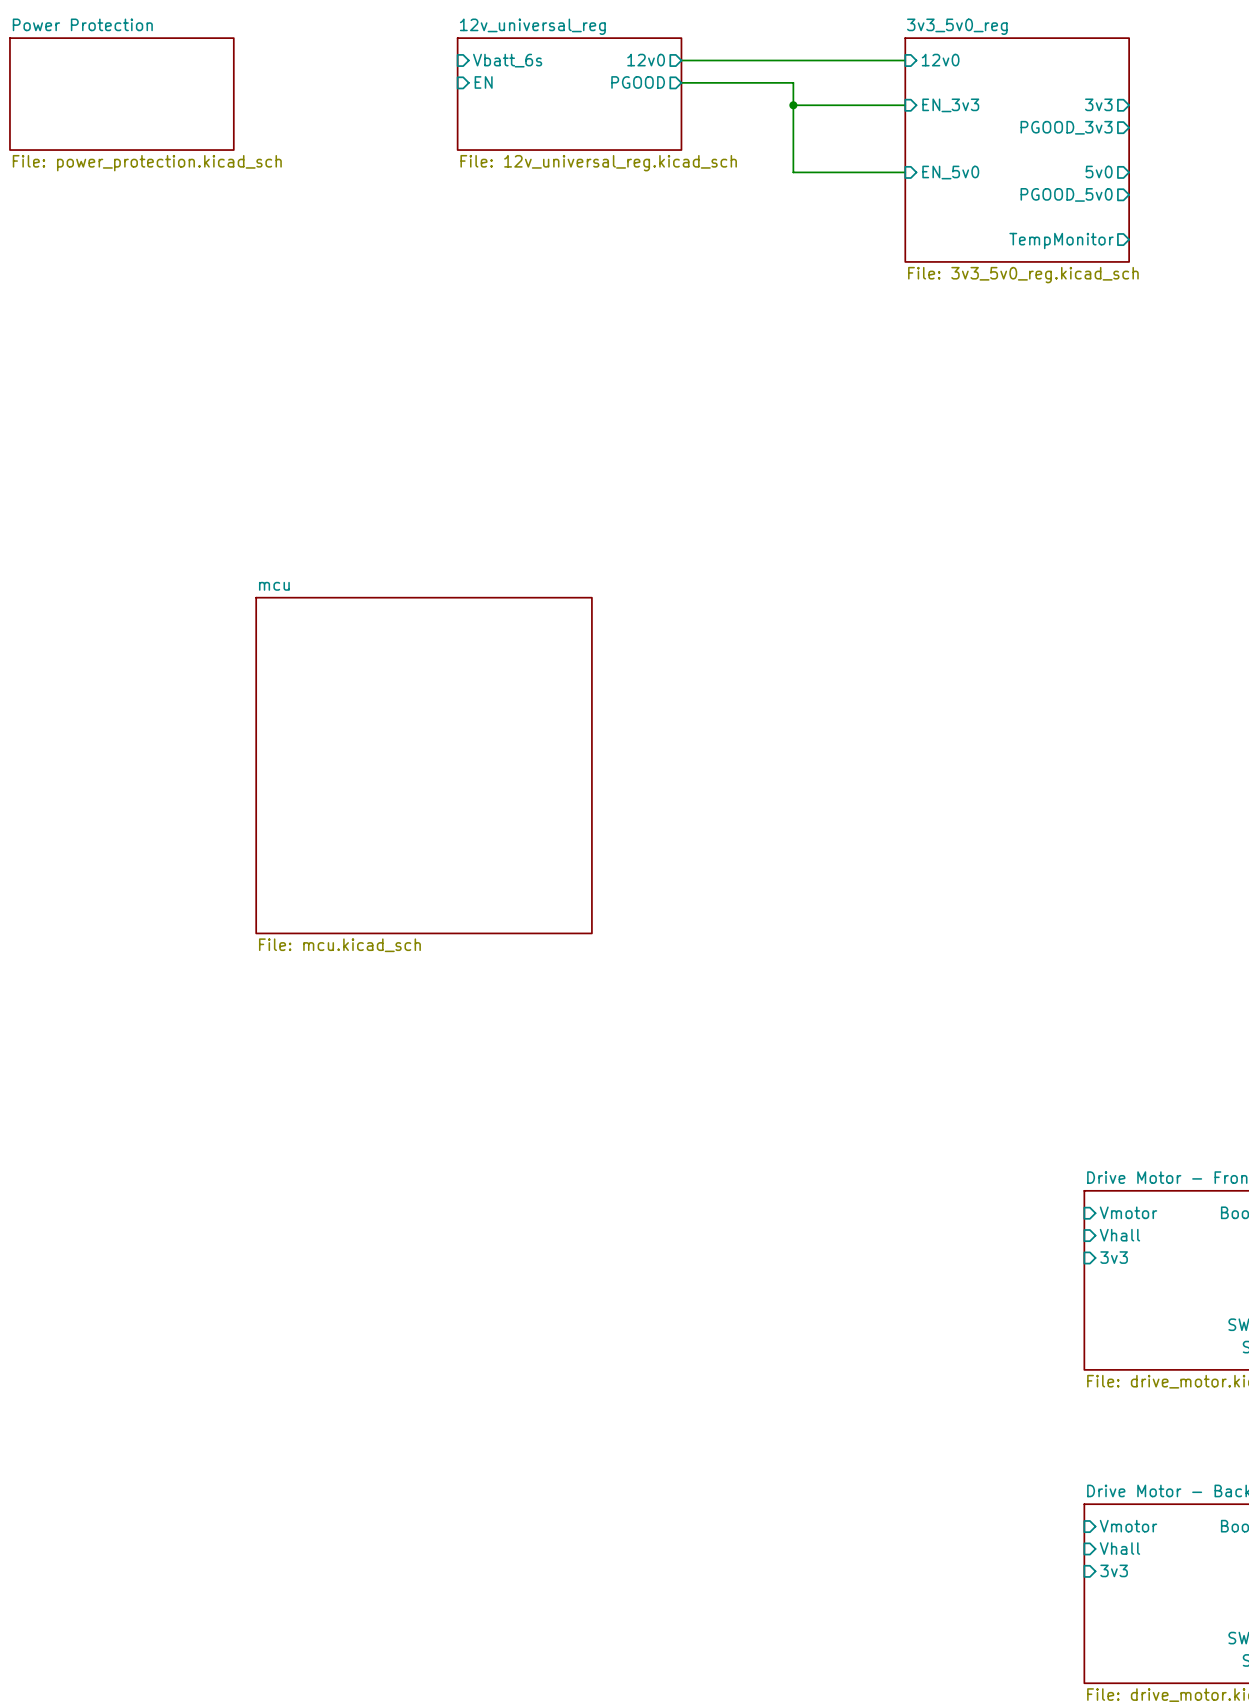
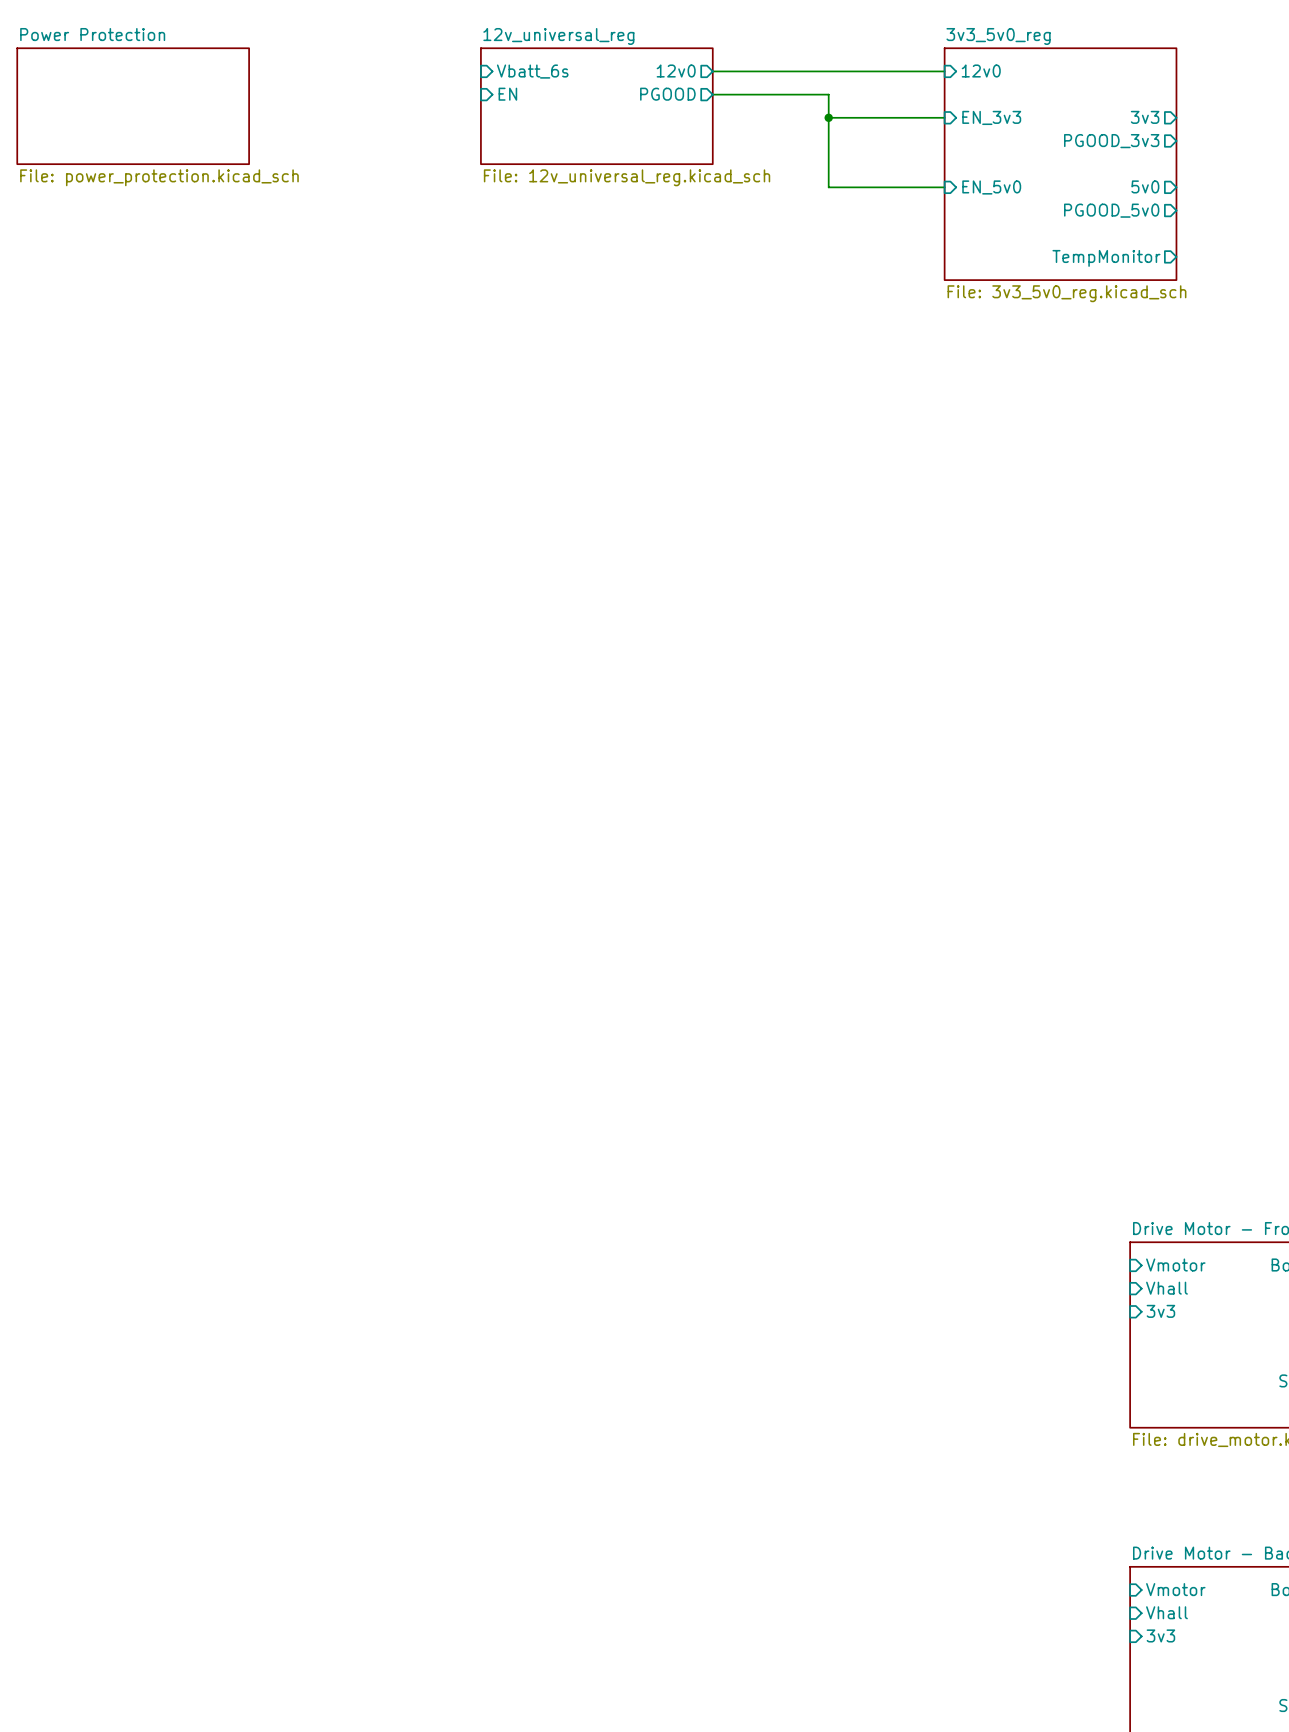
sheet mcu: File: mcu.kicad_sch (424, 765) -> none

